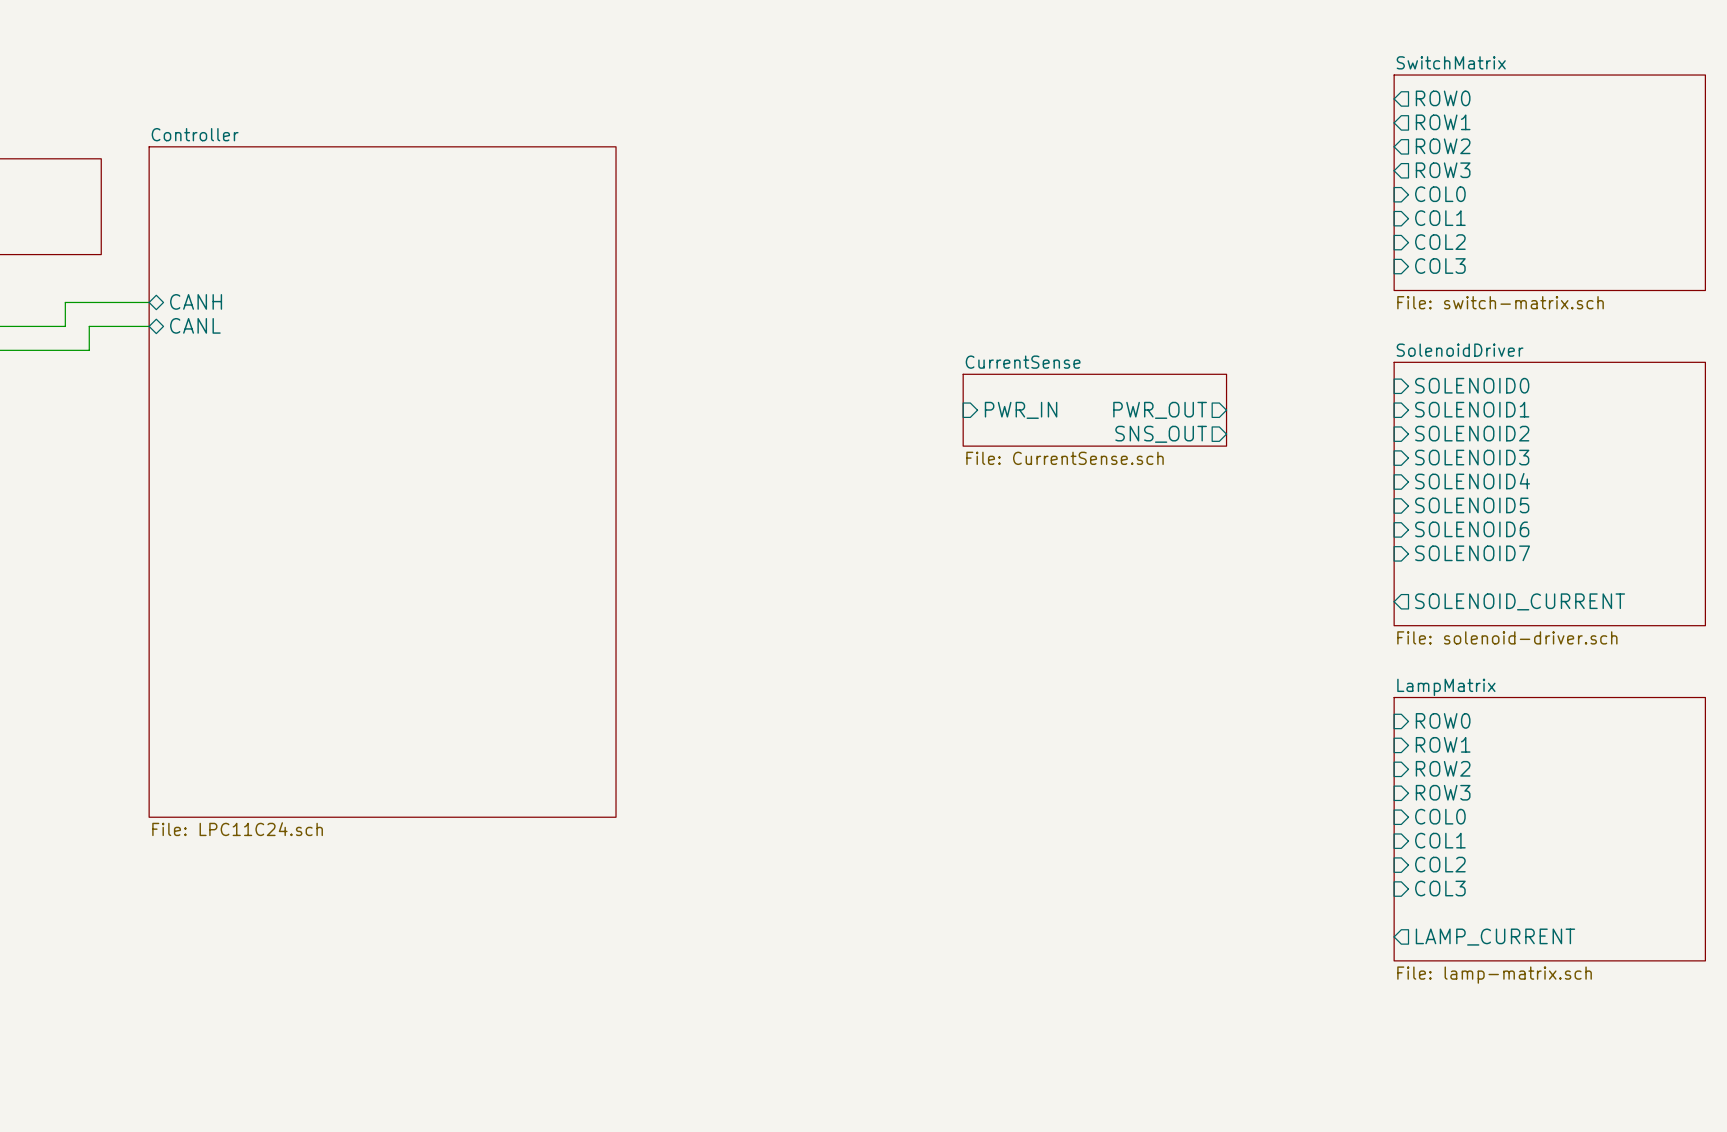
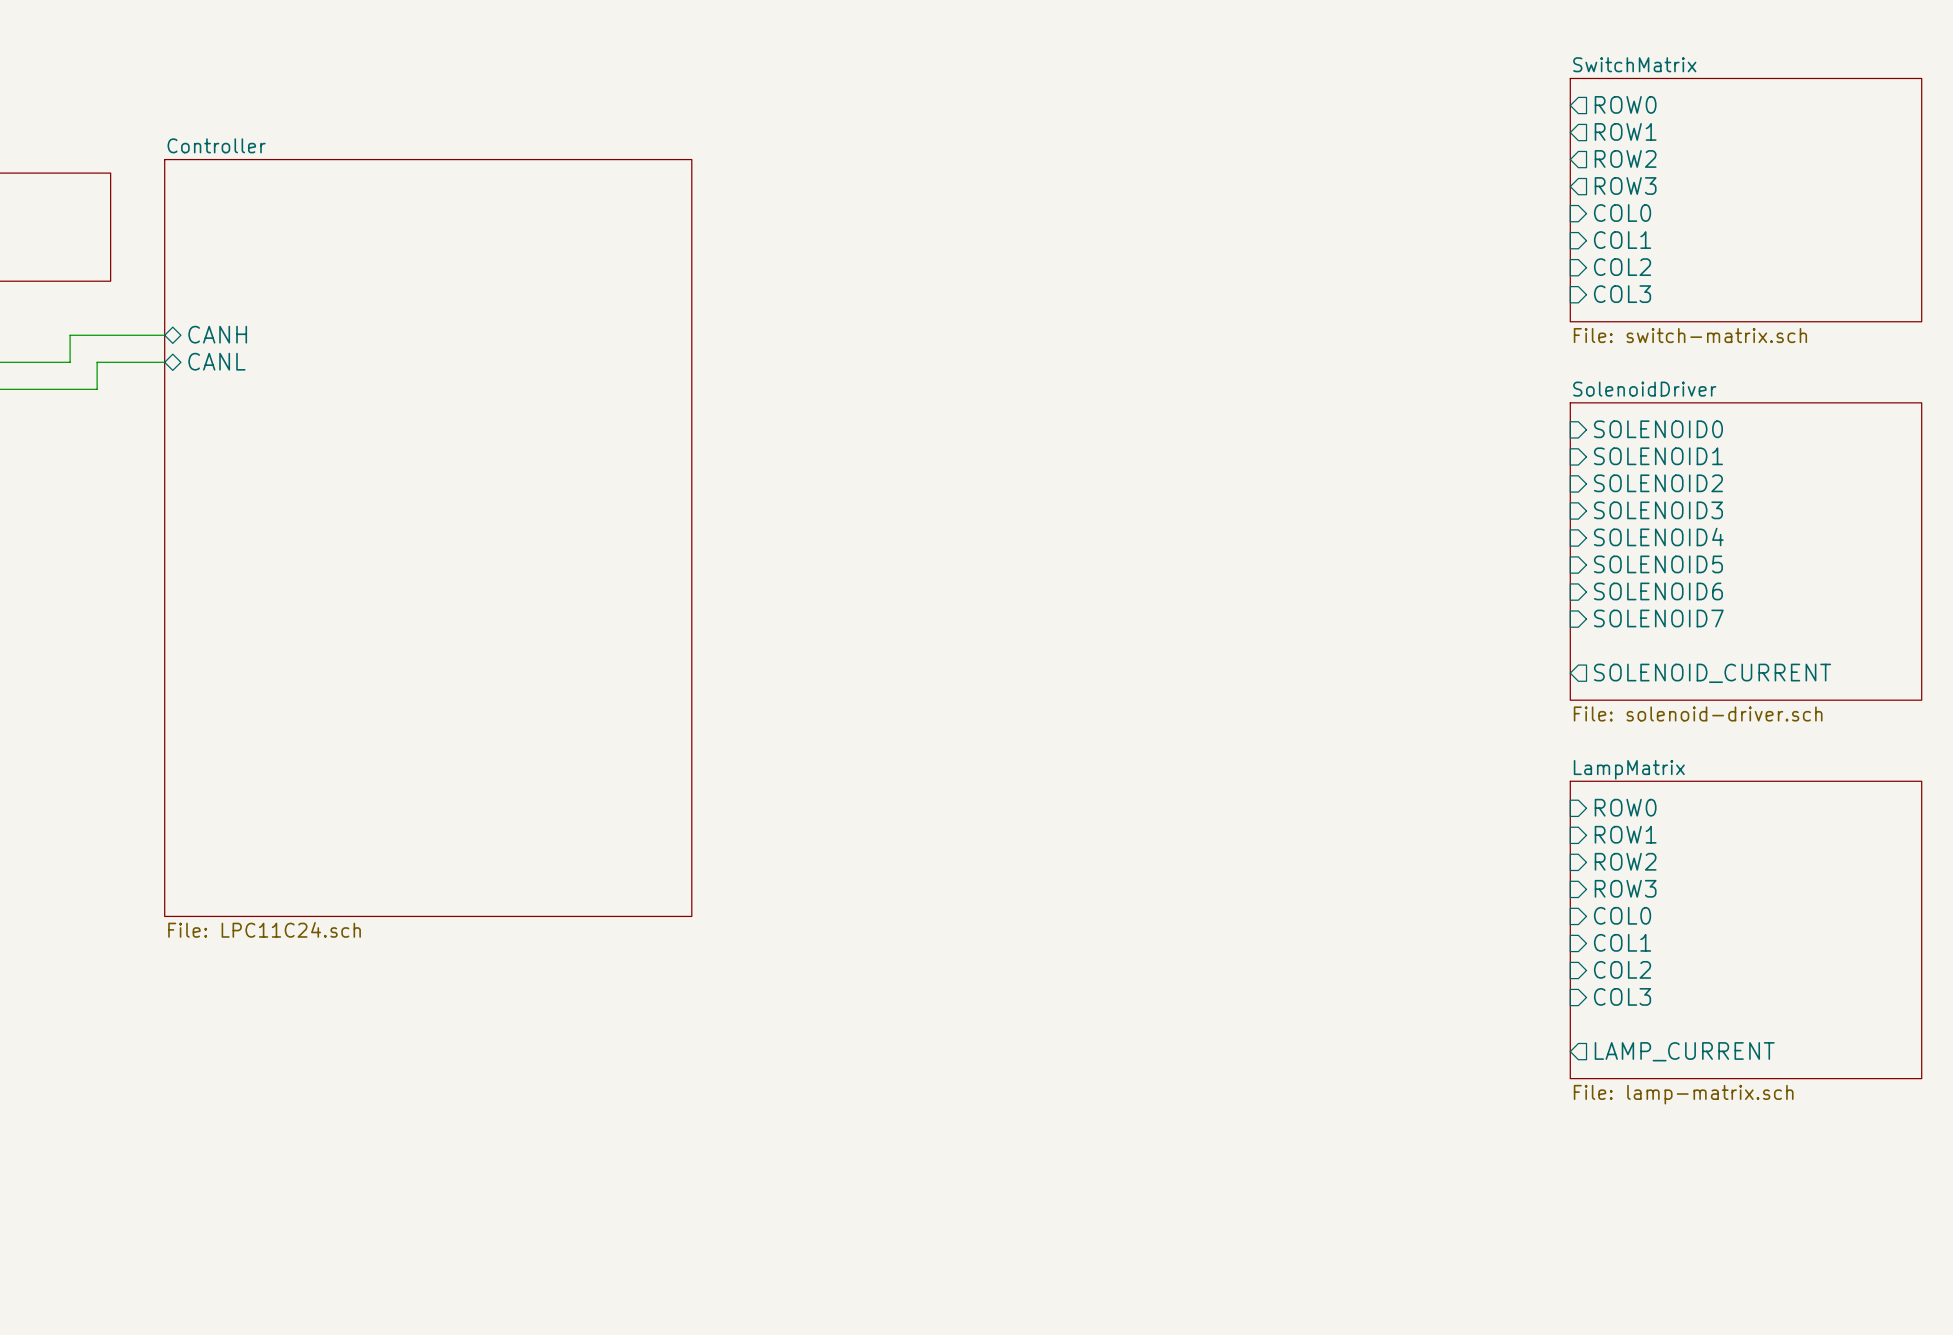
sheet pin: PWR_IN (1021, 410) -> none
sheet CurrentSense: File: CurrentSense.sch (1094, 410) -> none
sheet pin: PWR_OUT (1160, 410) -> none
sheet pin: SNS_OUT (1161, 434) -> none

